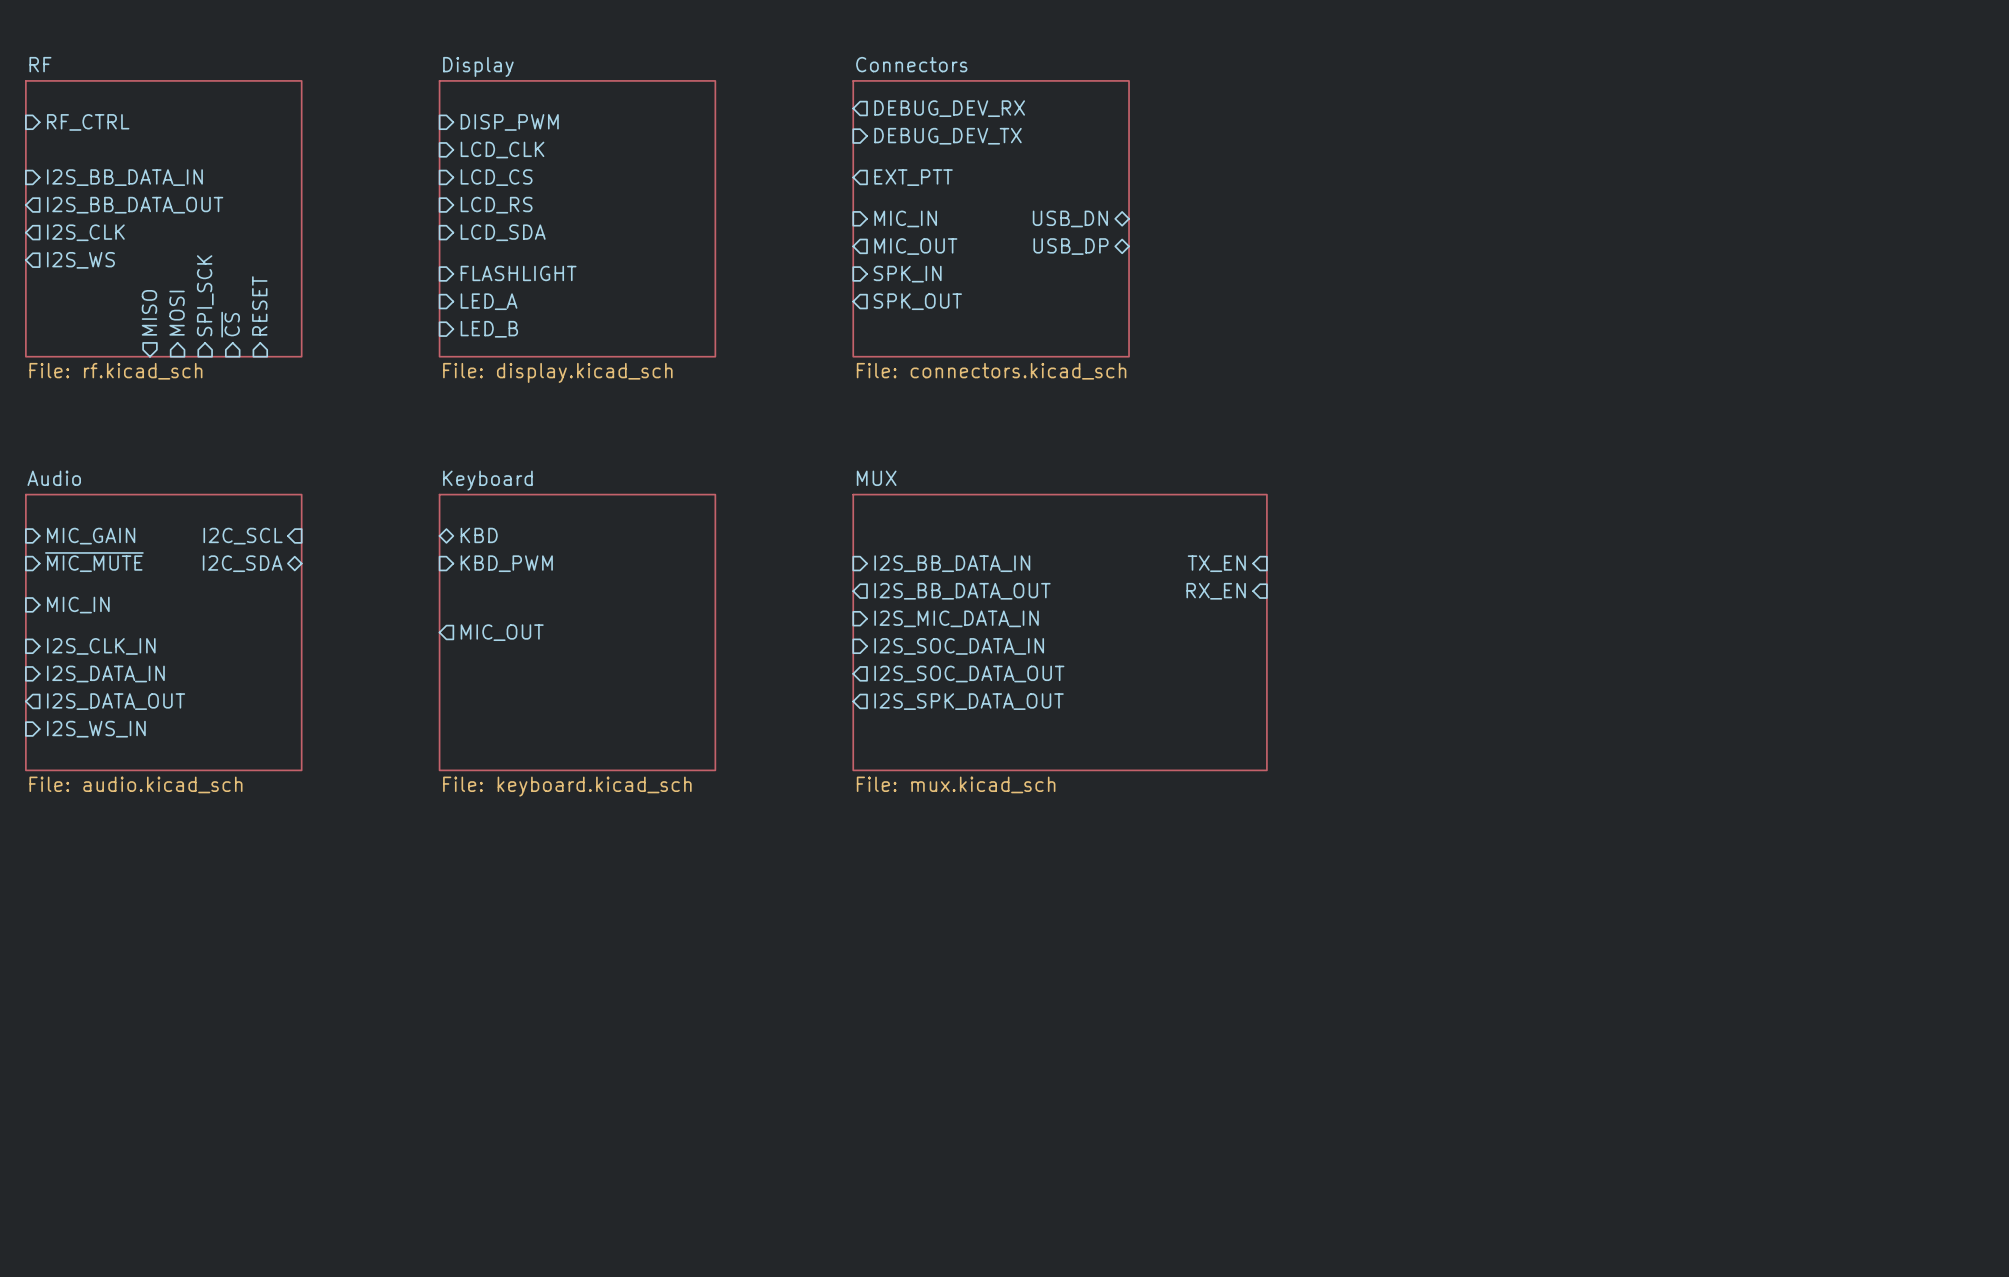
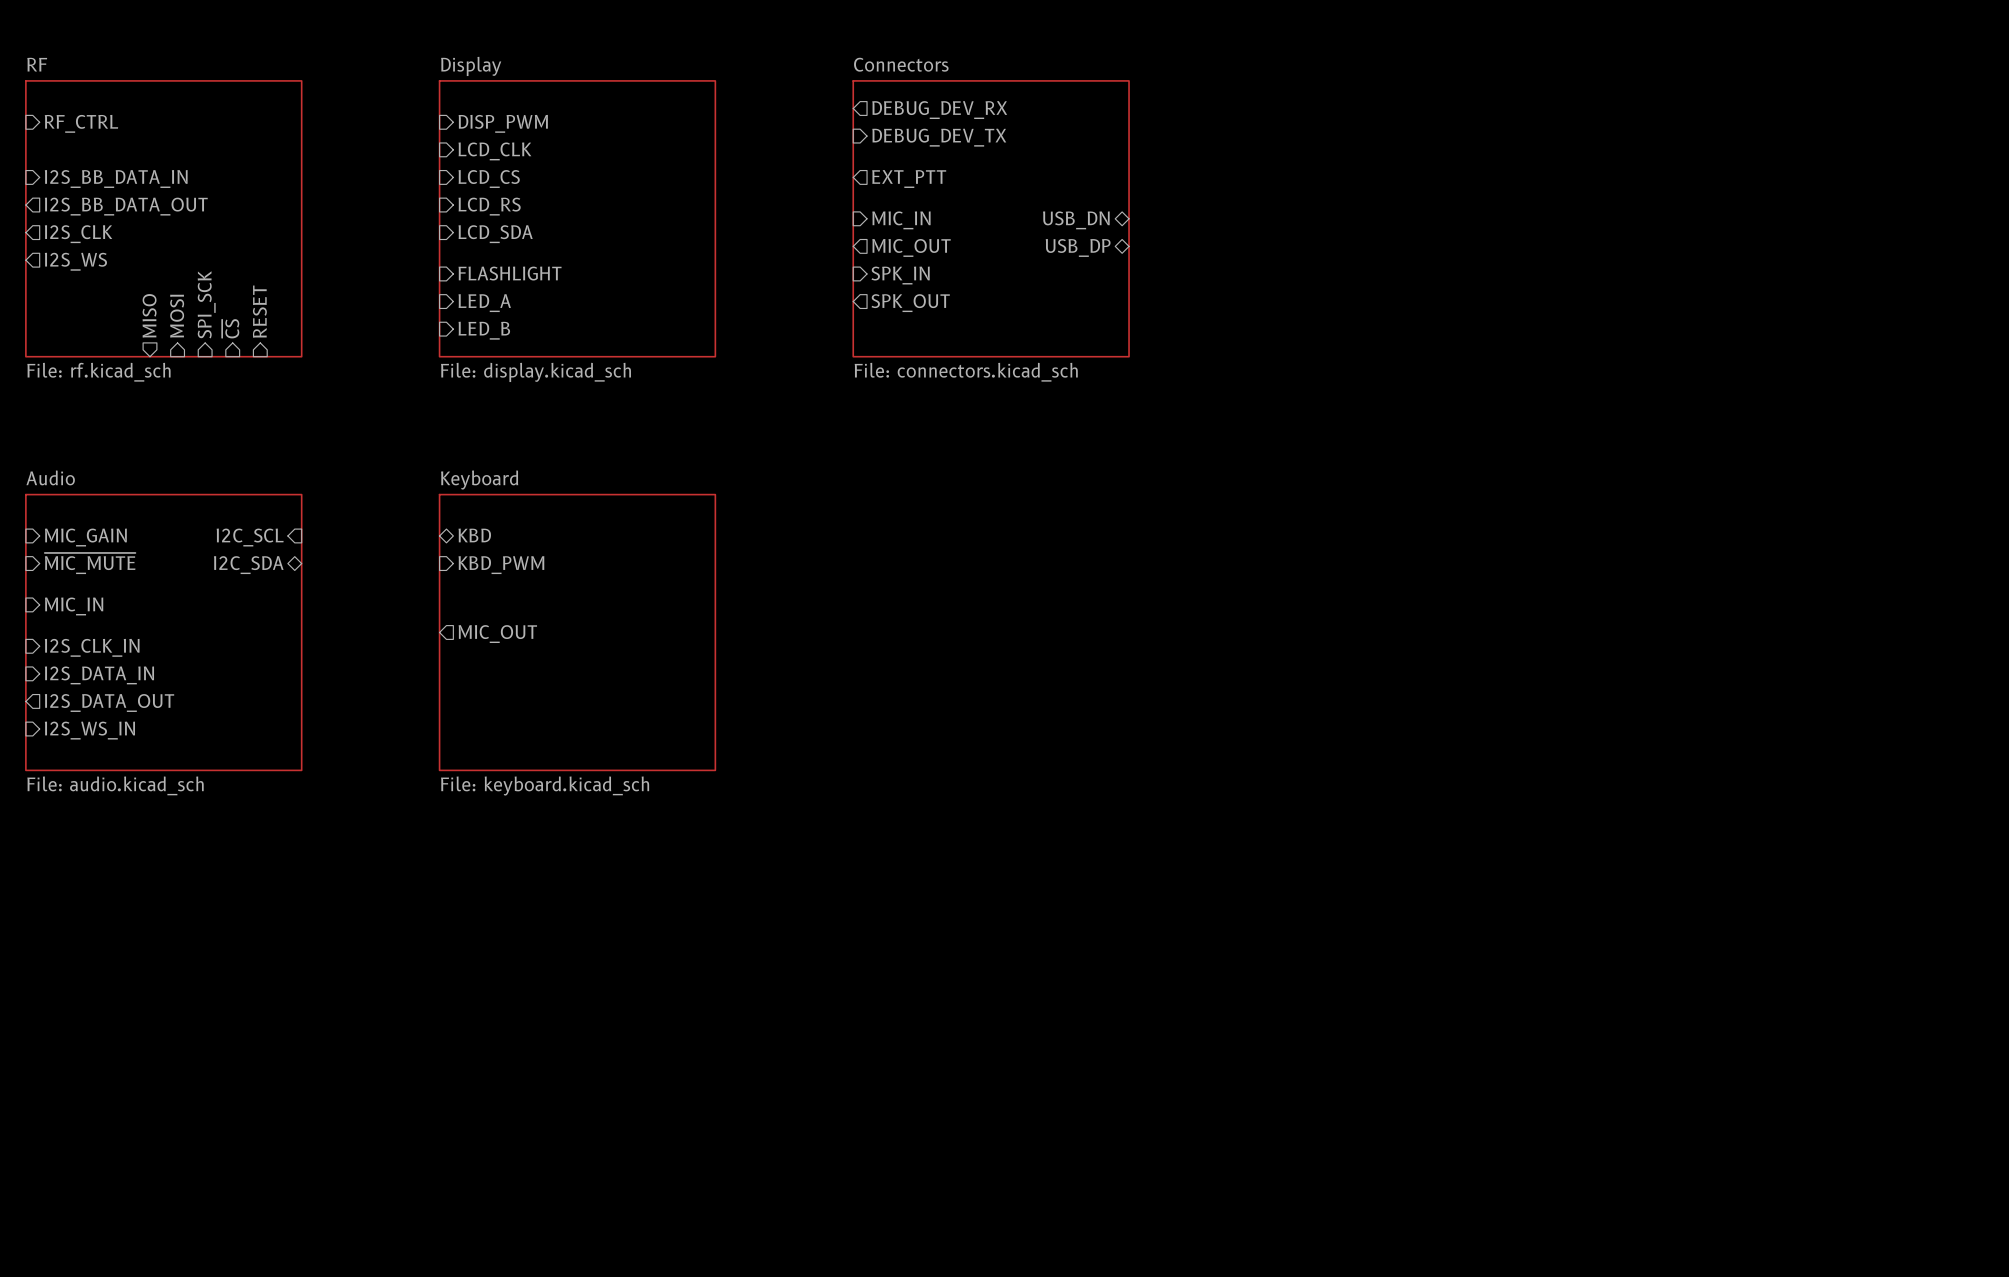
sheet pin: I2S_BB_DATA_IN (952, 563) -> none
sheet pin: TX_EN (1216, 563) -> none
sheet pin: I2S_BB_DATA_OUT (962, 591) -> none
sheet pin: RX_EN (1216, 591) -> none
sheet pin: I2S_MIC_DATA_IN (956, 618) -> none
sheet MUX: File: mux.kicad_sch (1060, 632) -> none
sheet pin: I2S_SOC_DATA_IN (959, 646) -> none
sheet pin: I2S_SOC_DATA_OUT (969, 674) -> none
sheet pin: I2S_SPK_DATA_OUT (969, 701) -> none

